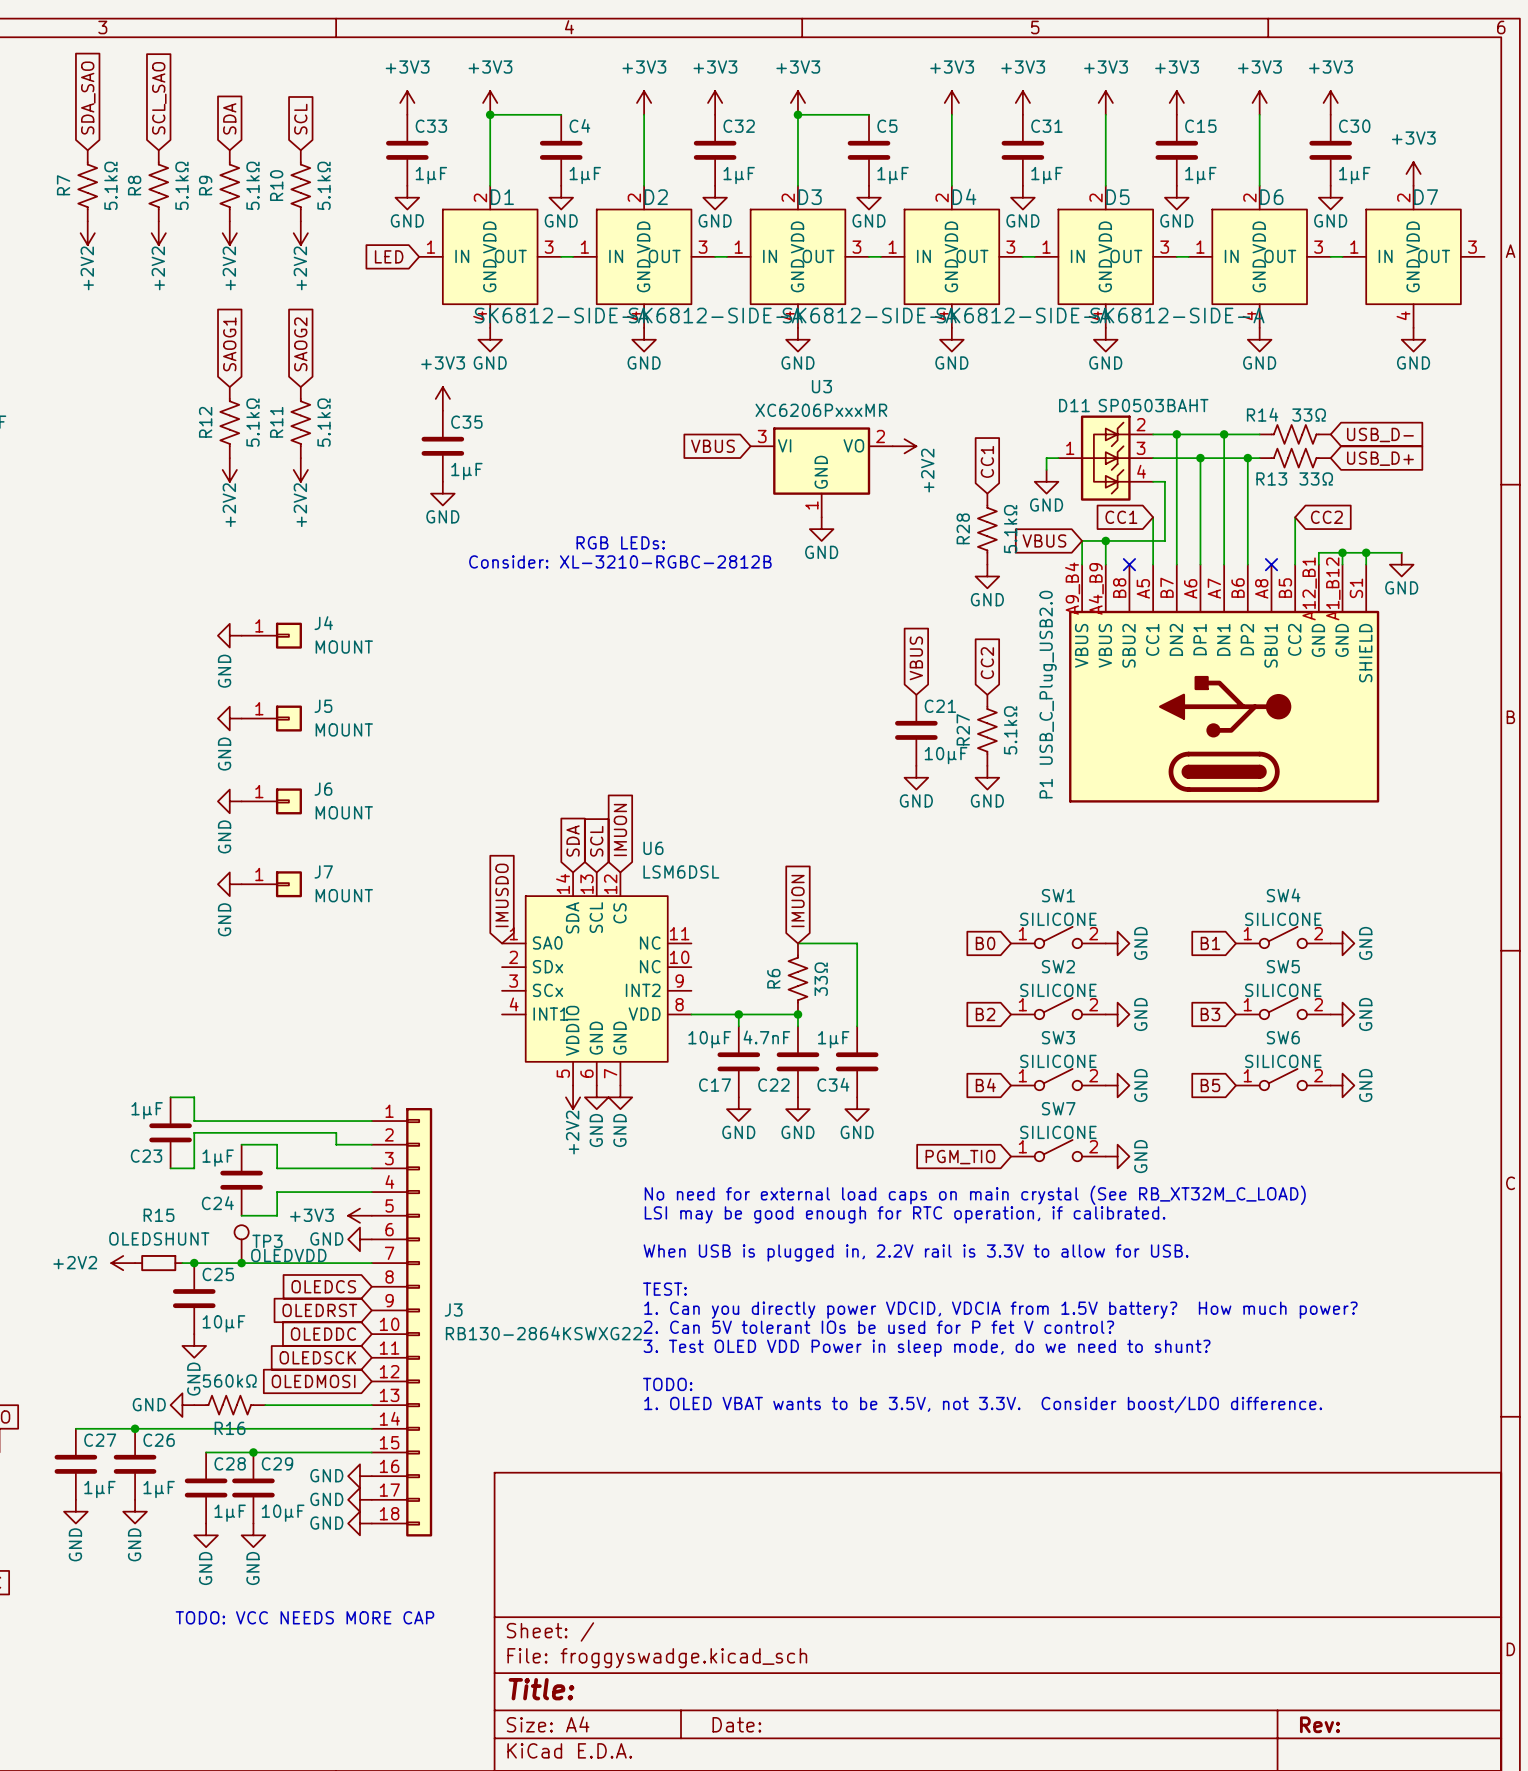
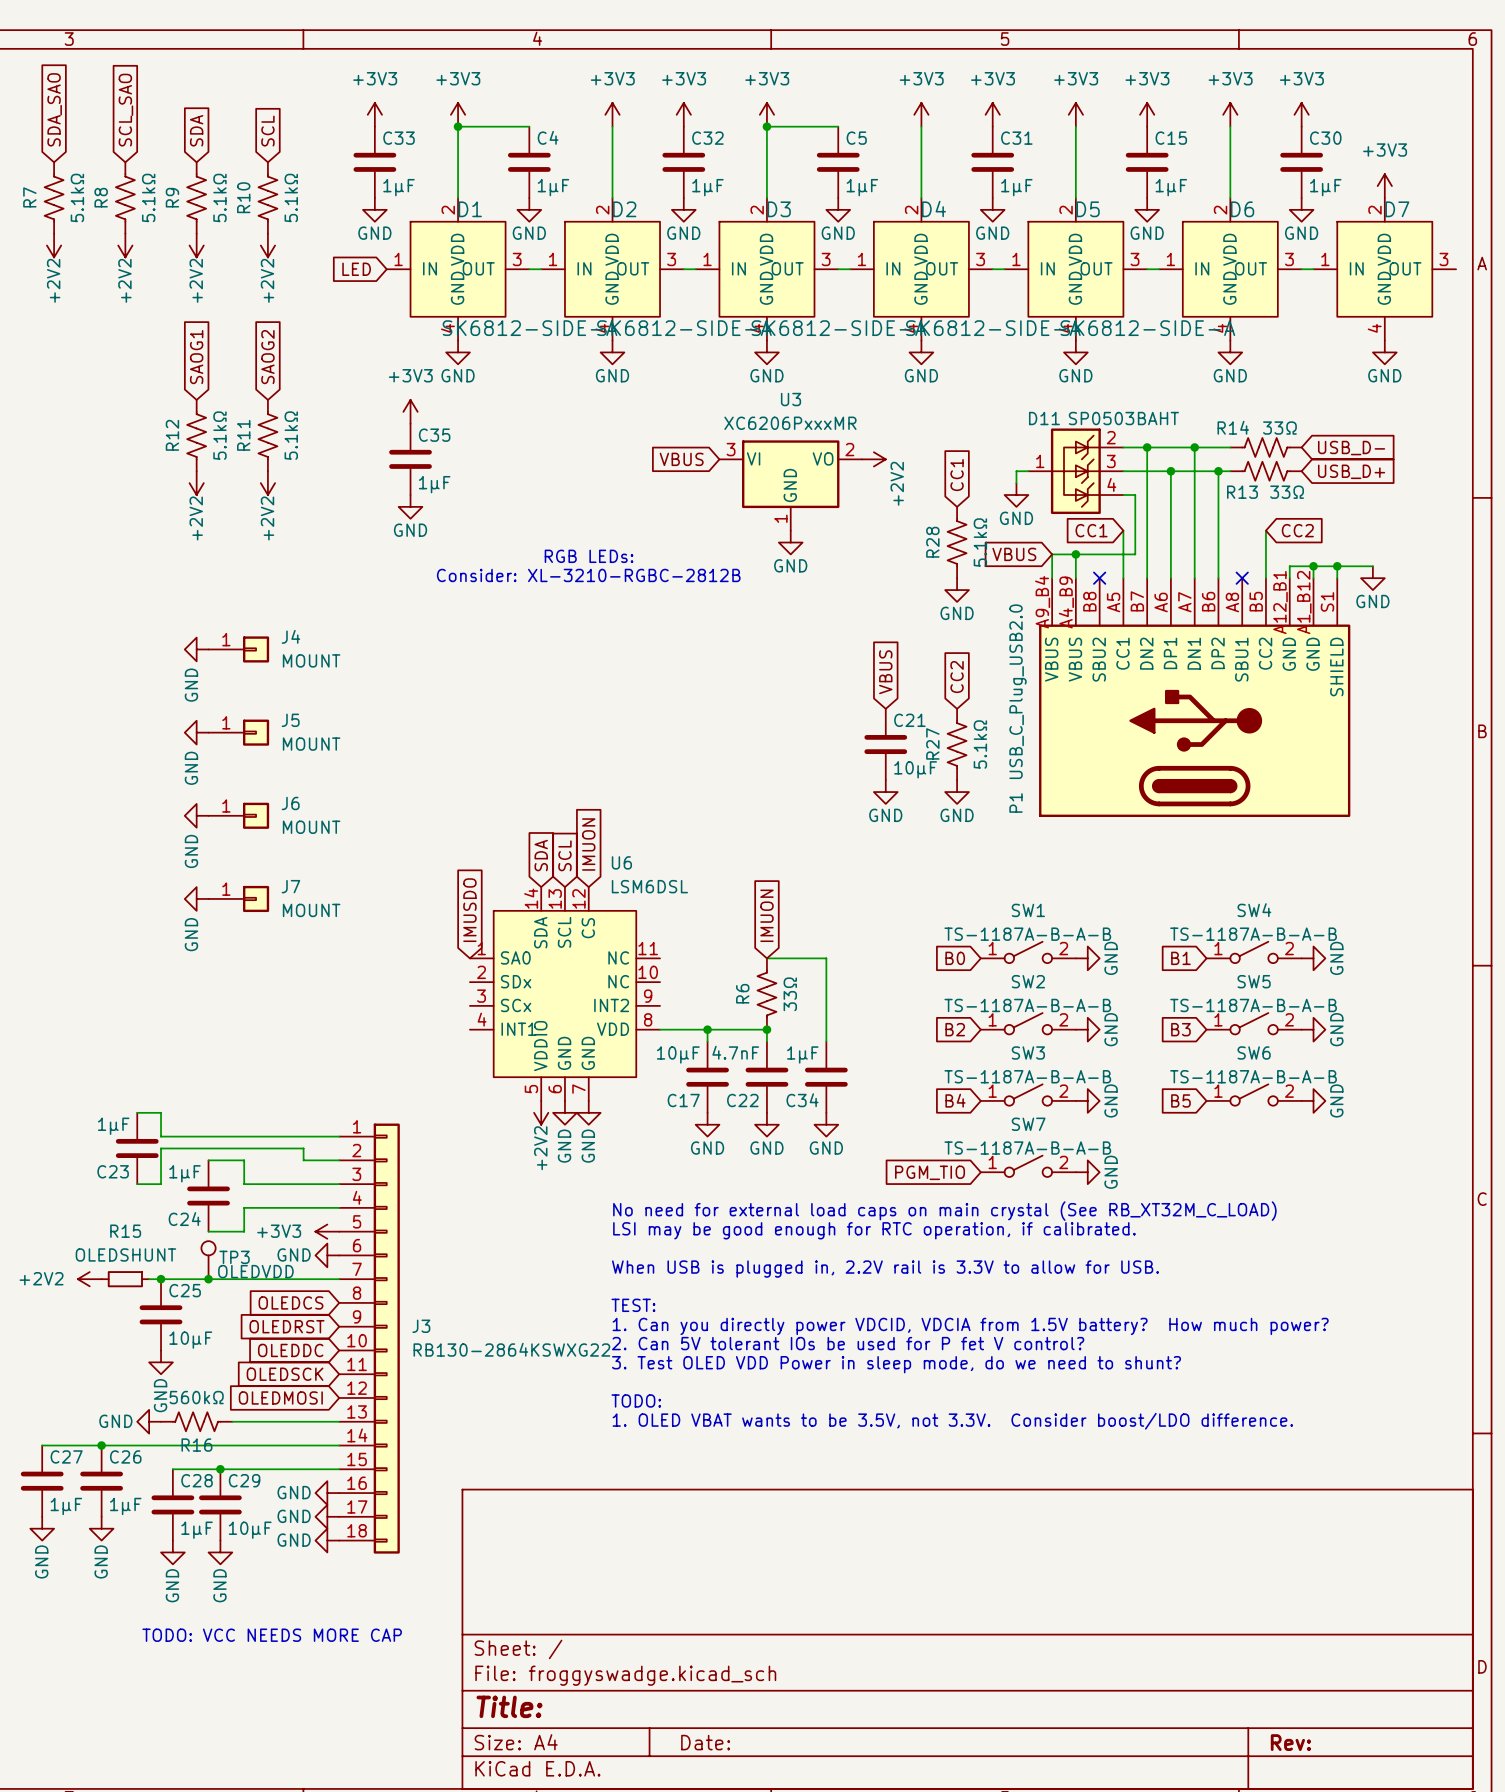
SW1 value: SILICONE (1058, 919) -> TS-1187A-B-A-B (1027, 934)
SW4 value: SILICONE (1283, 919) -> TS-1187A-B-A-B (1253, 934)
SW2 value: SILICONE (1058, 990) -> TS-1187A-B-A-B (1027, 1005)
SW5 value: SILICONE (1283, 990) -> TS-1187A-B-A-B (1253, 1005)
SW3 value: SILICONE (1058, 1061) -> TS-1187A-B-A-B (1027, 1076)
SW6 value: SILICONE (1283, 1061) -> TS-1187A-B-A-B (1253, 1076)
SW7 value: SILICONE (1058, 1132) -> TS-1187A-B-A-B (1027, 1148)

